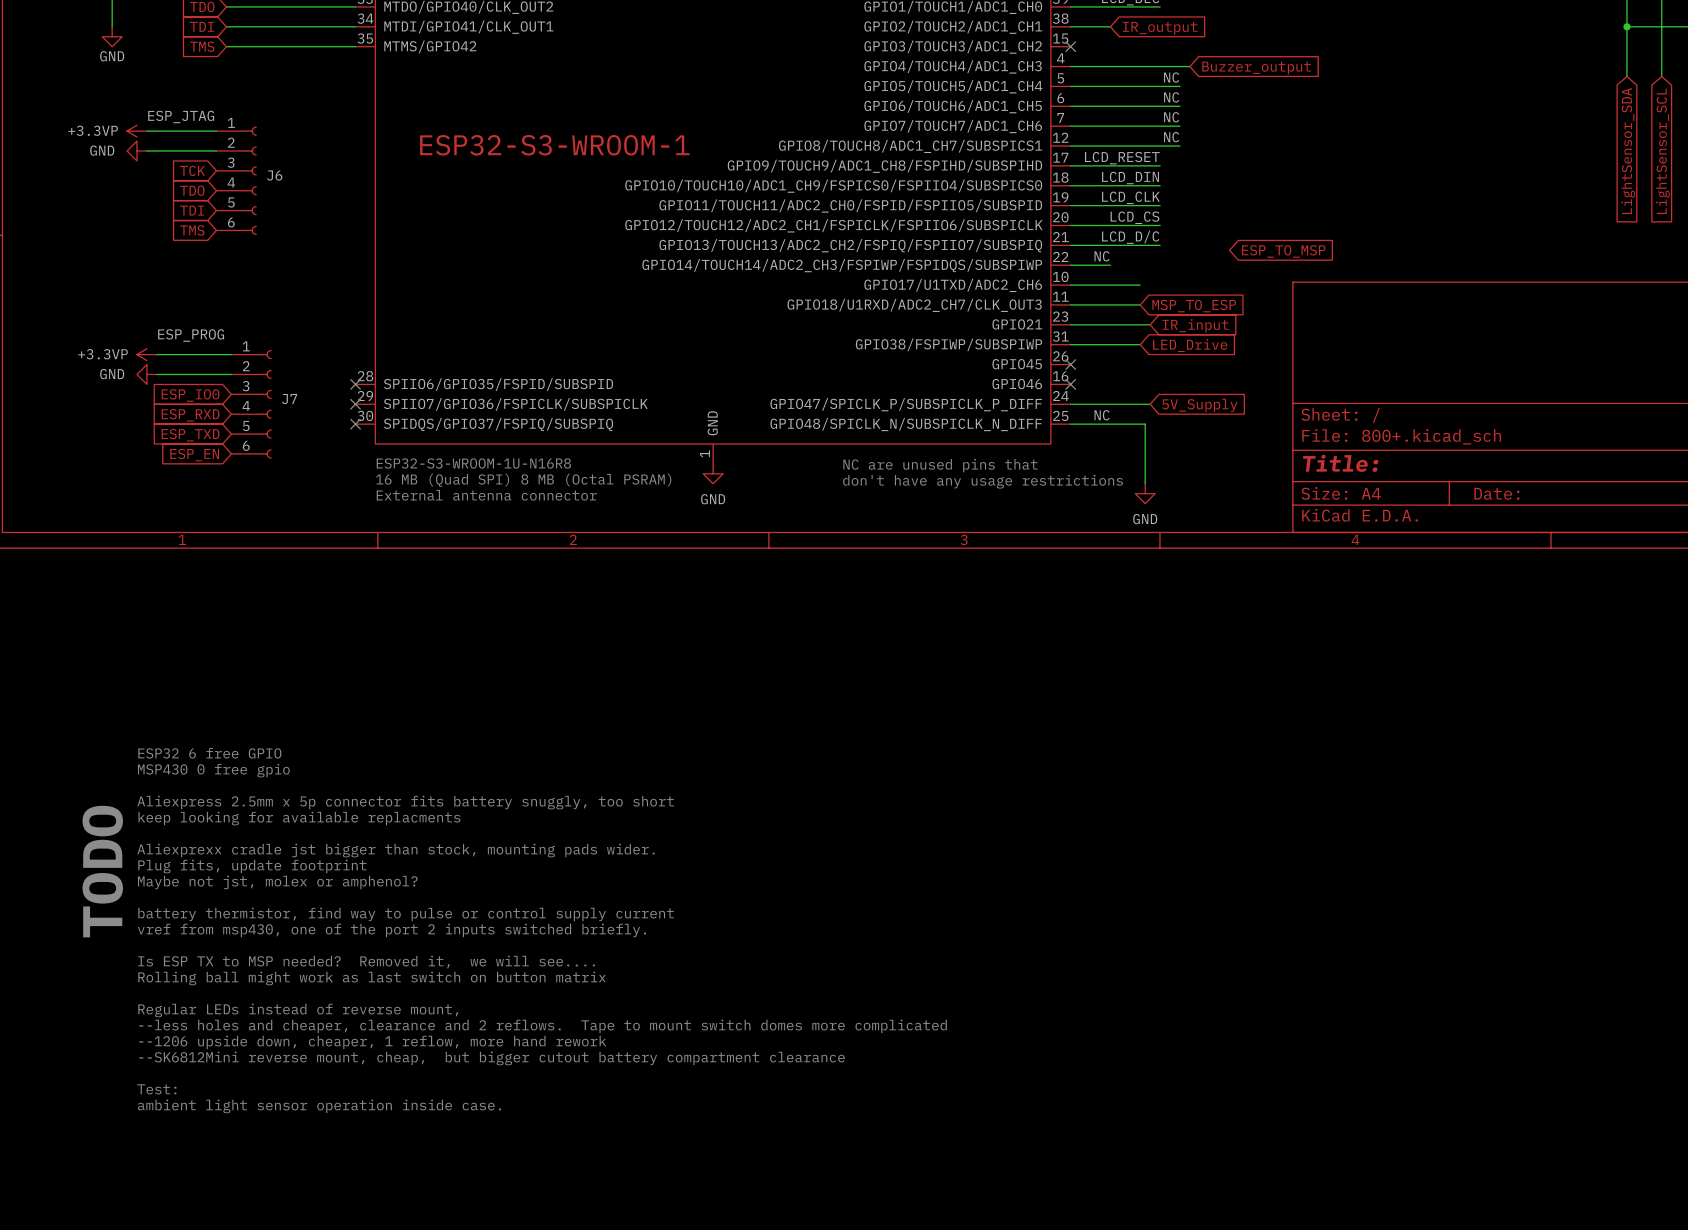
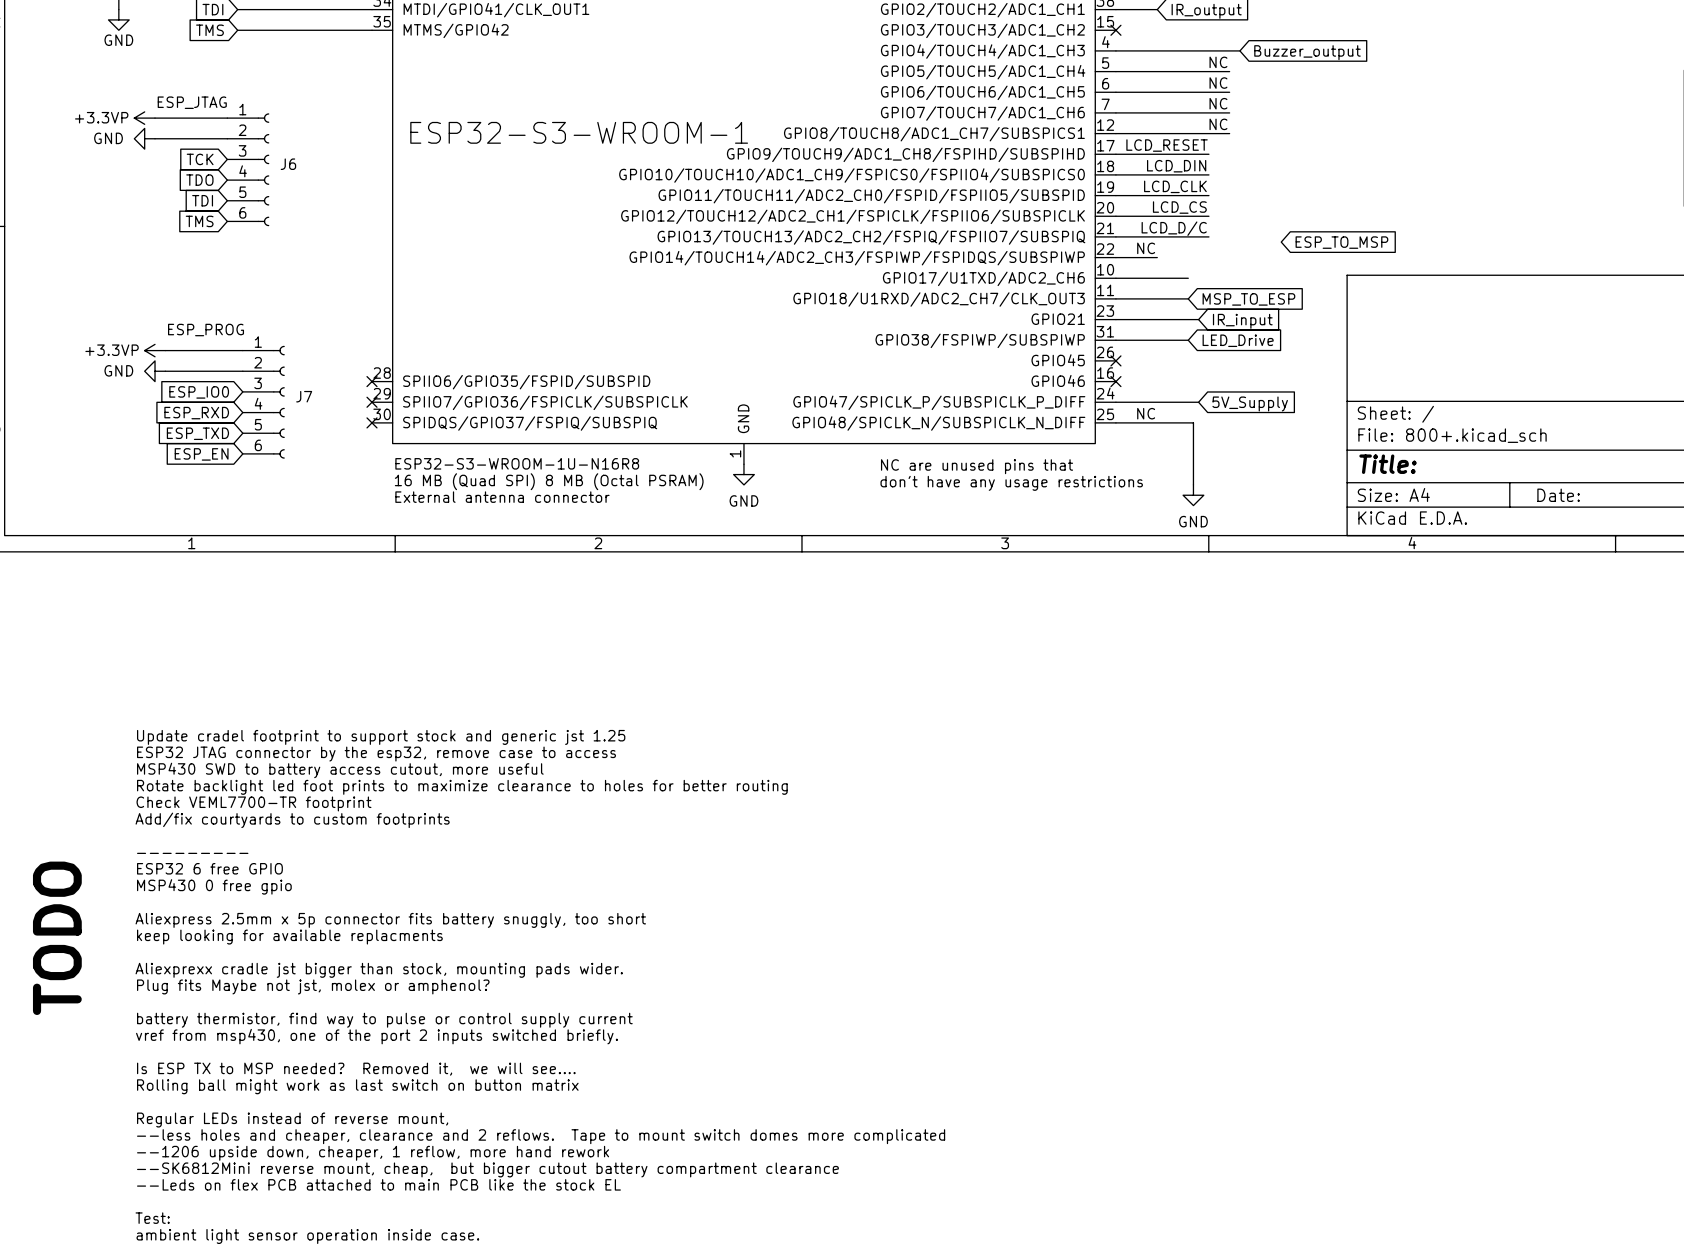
text: none -> Update cradel footprint to support stock and generic jst 1.25 (381, 737)
text: none -> ESP32 JTAG connector by the esp32, remove case to access (376, 754)
text position: ESP32 6 free GPIO (209, 753) -> ESP32 6 free GPIO (209, 868)
text: none -> MSP430 SWD to battery access cutout, more useful (340, 770)
text position: MSP430 0 free gpio (213, 770) -> MSP430 0 free gpio (214, 886)
text: none -> Rotate backlight led foot prints to maximize clearance to holes for better routing (462, 787)
text: none -> Check VEML7700-TR footprint (253, 803)
text position: Aliexpress 2.5mm x 5p connector fits battery snuggly, too short (405, 802) -> Aliexpress 2.5mm x 5p connector fits battery snuggly, too short (390, 920)
text: none -> Add/fix courtyards to custom footprints (292, 820)
text position: keep looking for available replacments (299, 818) -> keep looking for available replacments (289, 937)
text: none -> --------- (192, 853)
text position: Aliexprexx cradle jst bigger than stock, mounting pads wider. (396, 850) -> Aliexprexx cradle jst bigger than stock, mounting pads wider. (379, 970)
text: Plug fits, update footprint (252, 866) -> none
text position: TODO (102, 871) -> TODO (57, 938)
text: Maybe not jst, molex or amphenol? (277, 882) -> none
text position: battery thermistor, find way to pulse or control supply current (406, 914) -> battery thermistor, find way to pulse or control supply current (384, 1020)
text position: vref from msp430, one of the port 2 inputs switched briefly. (392, 930) -> vref from msp430, one of the port 2 inputs switched briefly. (376, 1036)
text position: Is ESP TX to MSP needed? Removed it, we will see.... (366, 961) -> Is ESP TX to MSP needed? Removed it, we will see.... (356, 1069)
text: none -> Plug fits Maybe not jst, molex or amphenol? (313, 986)
text position: Rolling ball might work as last switch on button matrix (372, 978) -> Rolling ball might work as last switch on button matrix (357, 1086)
text position: Regular LEDs instead of reverse mount, (298, 1010) -> Regular LEDs instead of reverse mount, (292, 1120)
text position: --less holes and cheaper, clearance and 2 reflows. Tape to mount switch domes more complicated (543, 1026) -> --less holes and cheaper, clearance and 2 reflows. Tape to mount switch domes more complicated (541, 1136)
text position: --1206 upside down, cheaper, 1 reflow, more hand rework (372, 1042) -> --1206 upside down, cheaper, 1 reflow, more hand rework (373, 1153)
text position: --SK6812Mini reverse mount, cheap, but bigger cutout battery compartment clearance (491, 1058) -> --SK6812Mini reverse mount, cheap, but bigger cutout battery compartment clearance (487, 1169)
text position: Test: (156, 1089) -> Test: (152, 1218)
text position: ambient light sensor operation inside case. (319, 1106) -> ambient light sensor operation inside case. (307, 1236)
text: none -> --Leds on flex PCB attached to main PCB like the stock EL (378, 1184)

